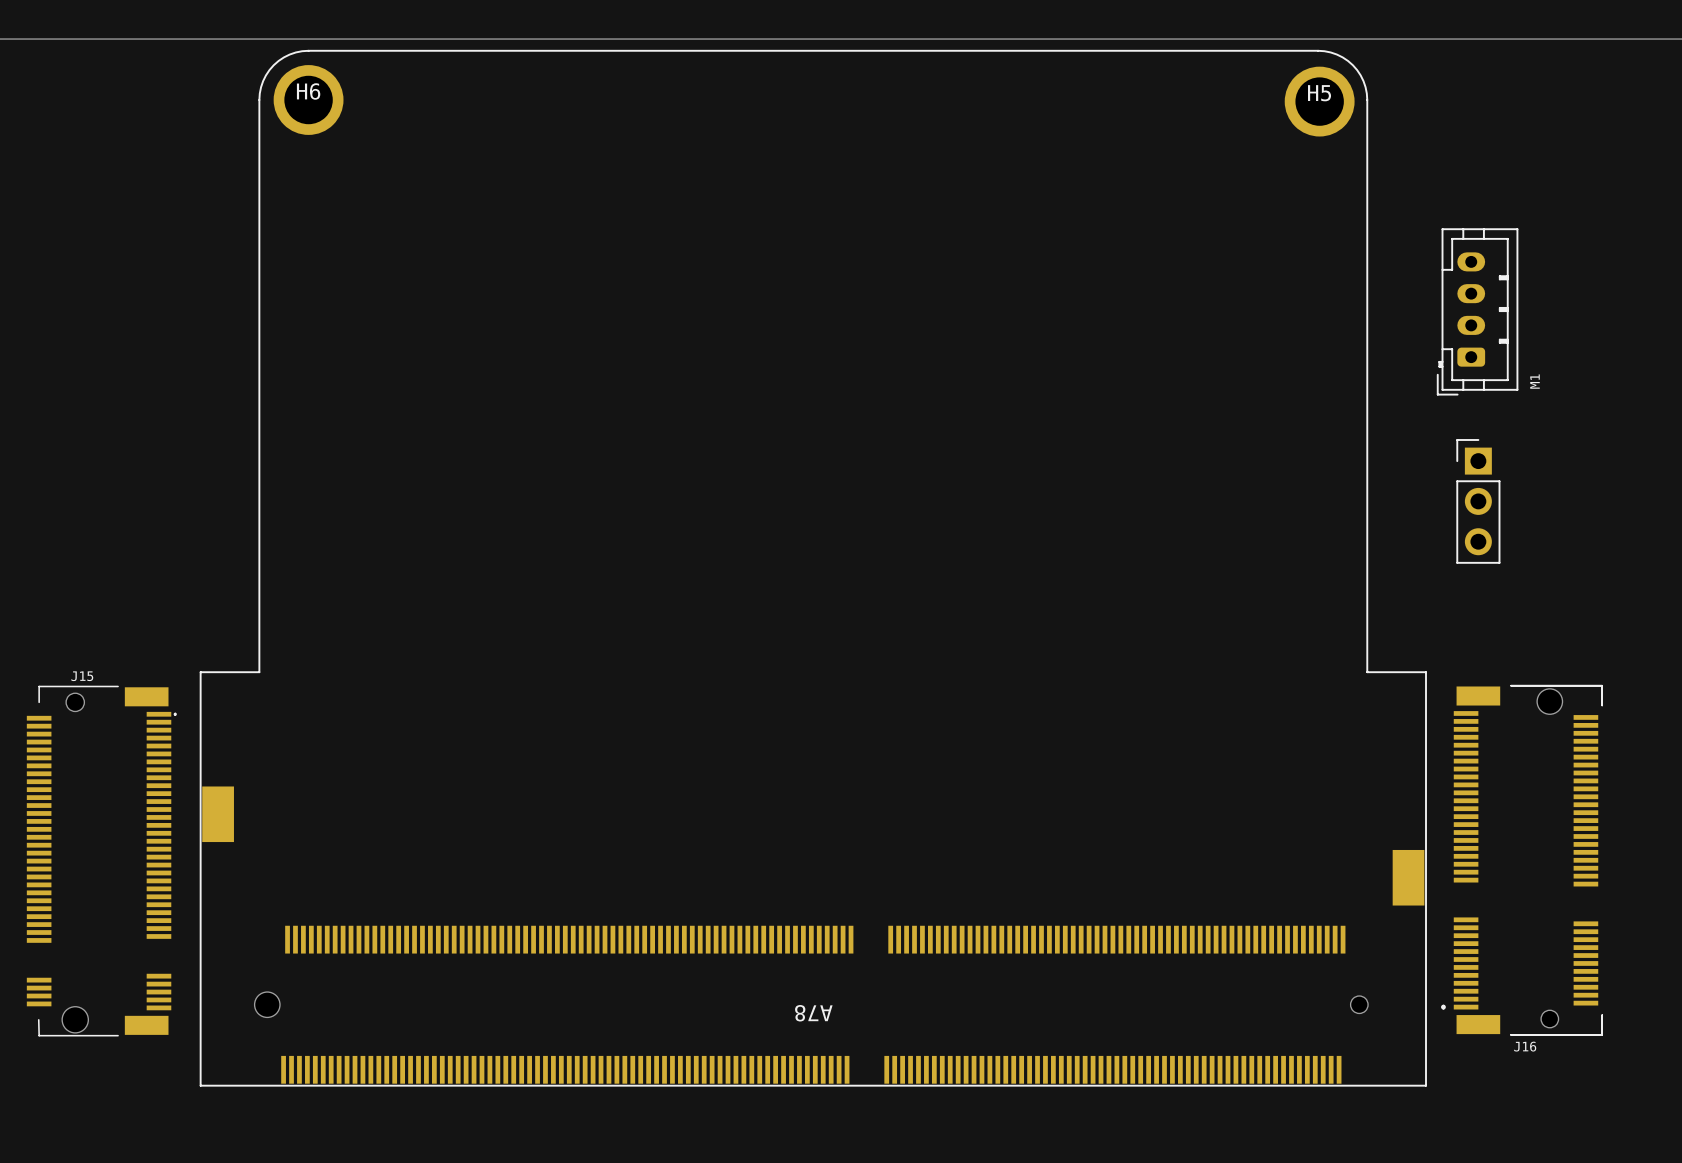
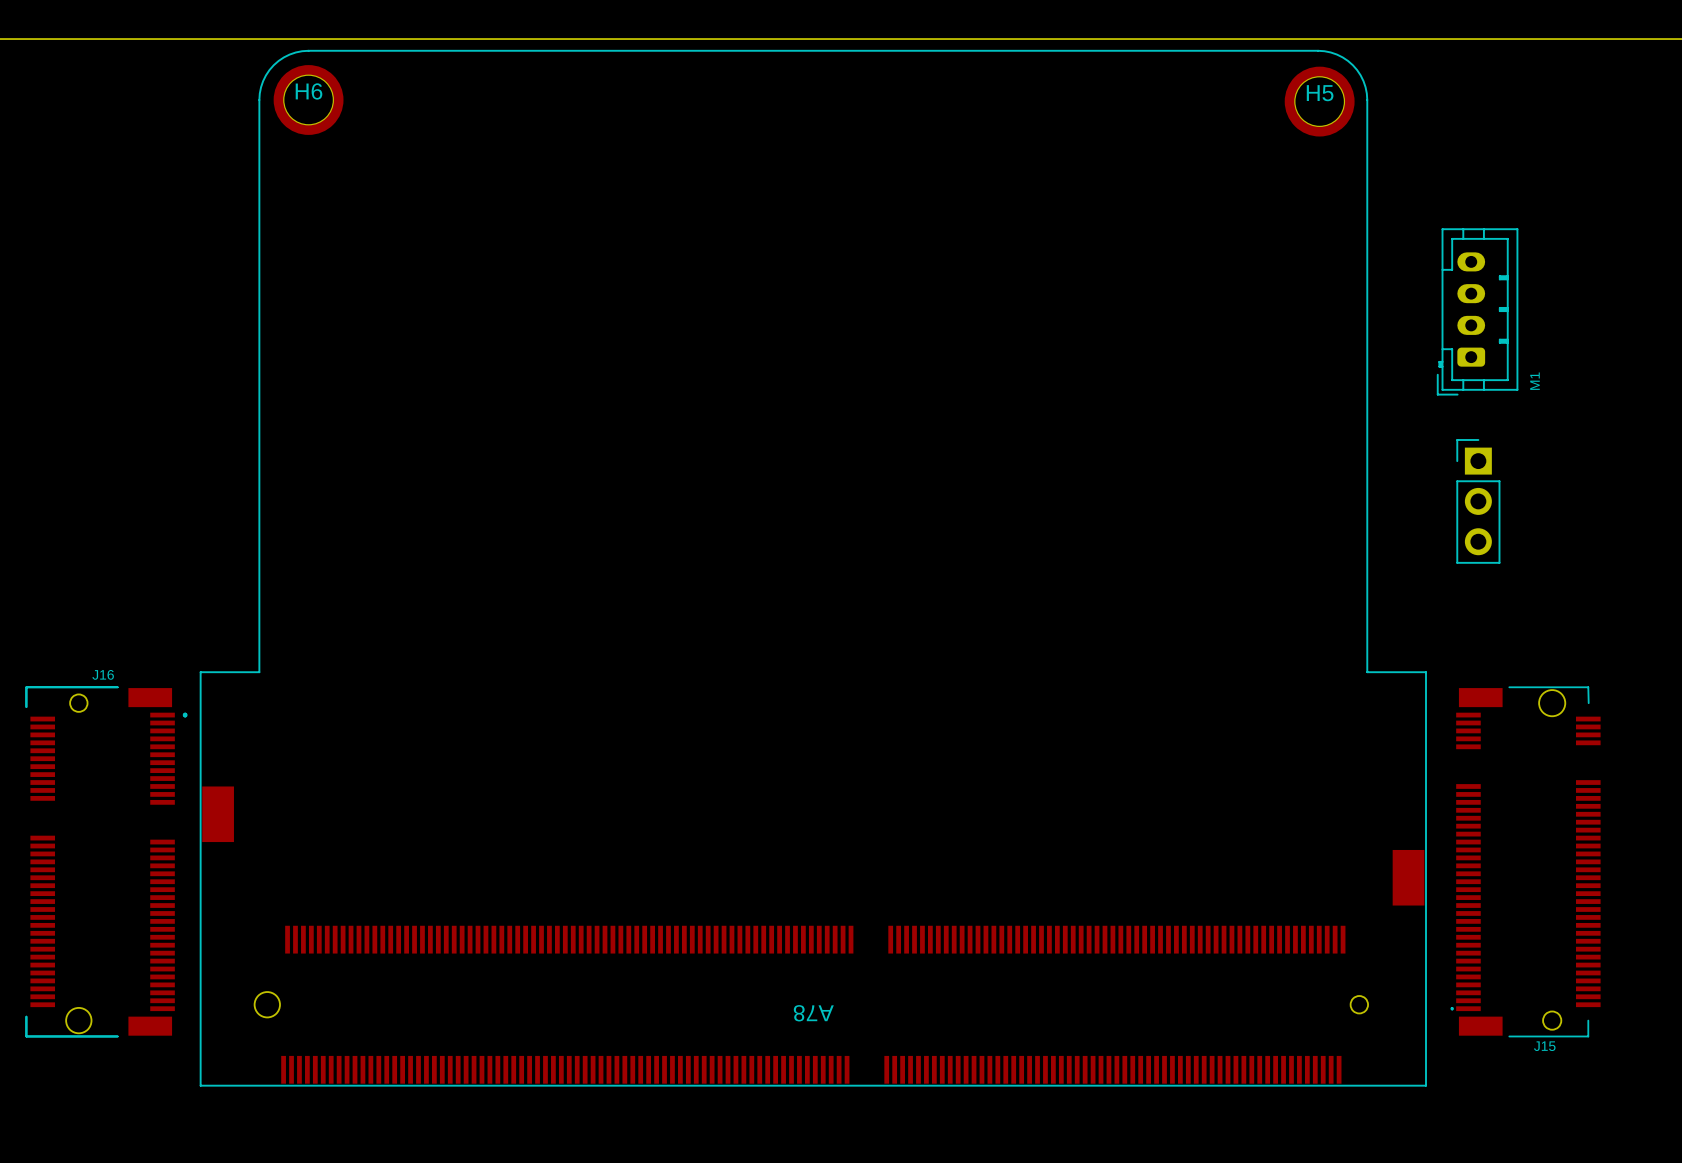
J16 rotation: 0° (1522, 860) -> 180° (106, 861)
J16 position: (1522, 860) -> (106, 861)
J15 rotation: 0° (101, 861) -> 180° (1525, 861)
J15 position: (101, 861) -> (1525, 861)

